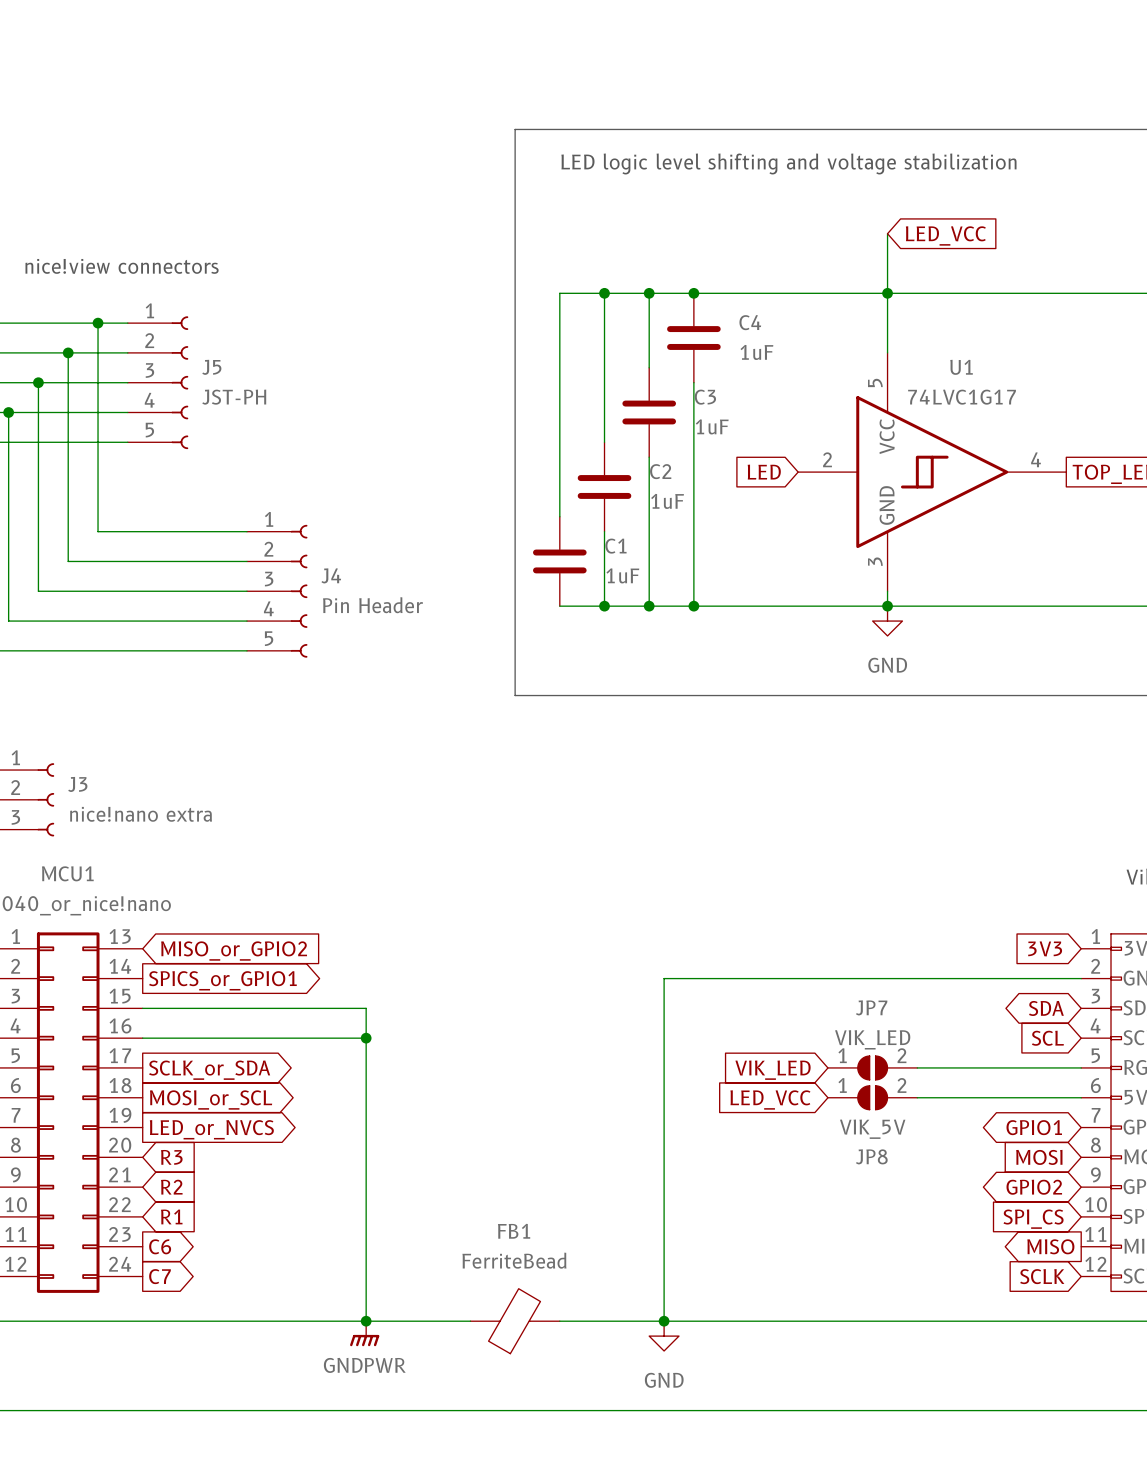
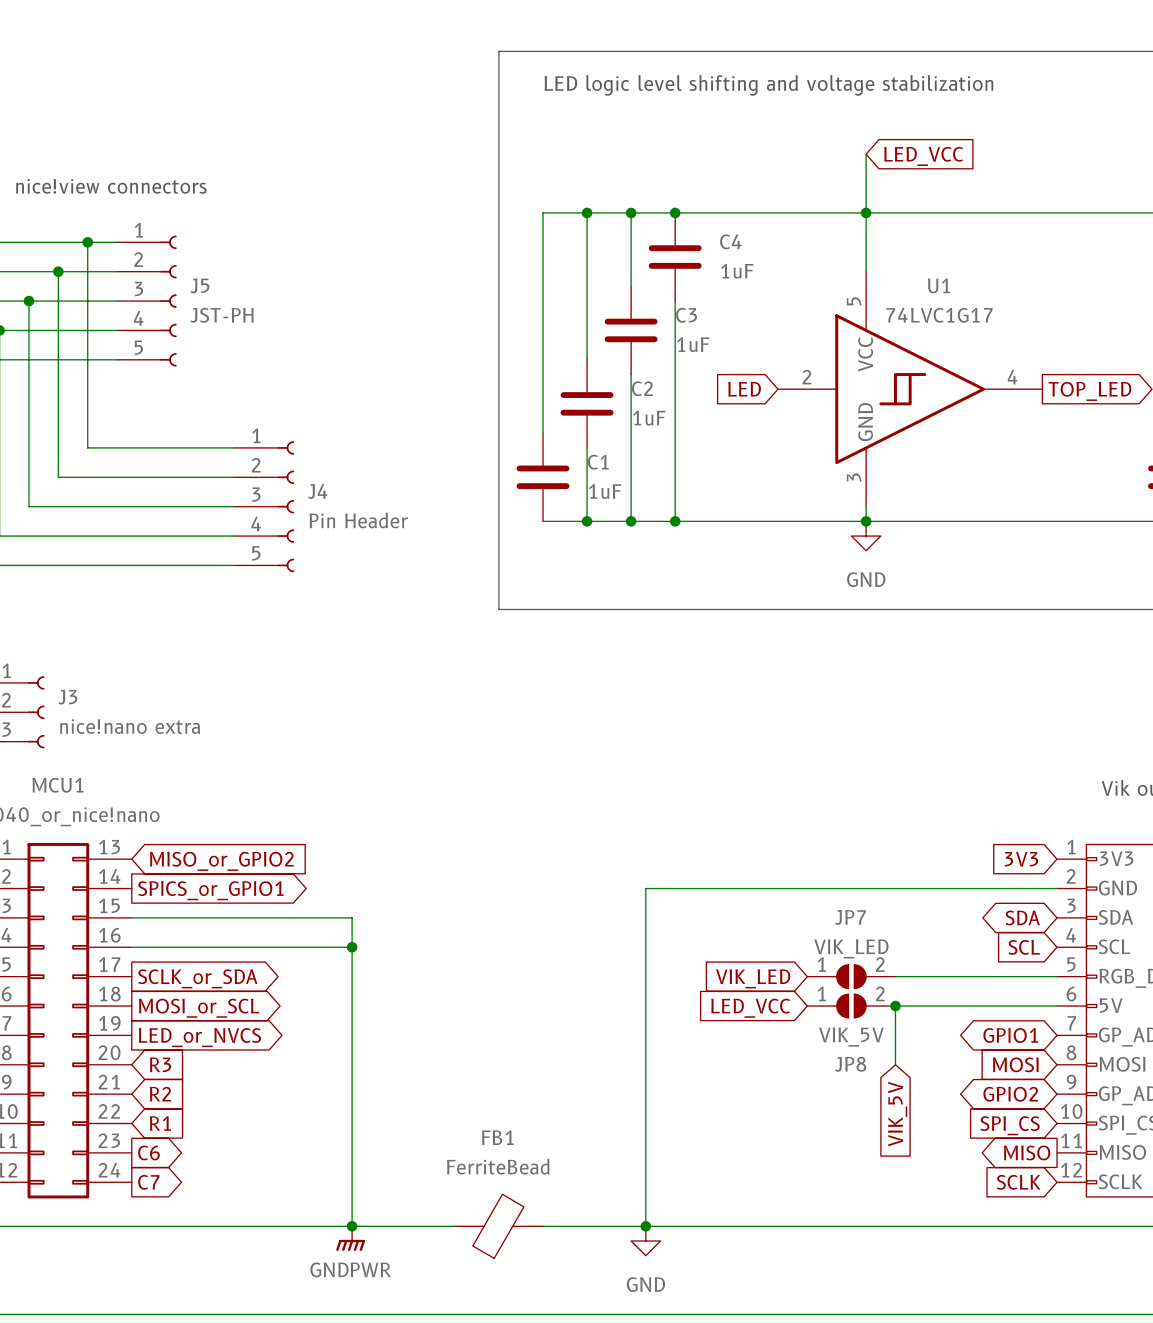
wire: none -> (895, 1006) (895, 1064)
junction: none -> (895, 1006)
global label: none -> VIK_5V (897, 1114)

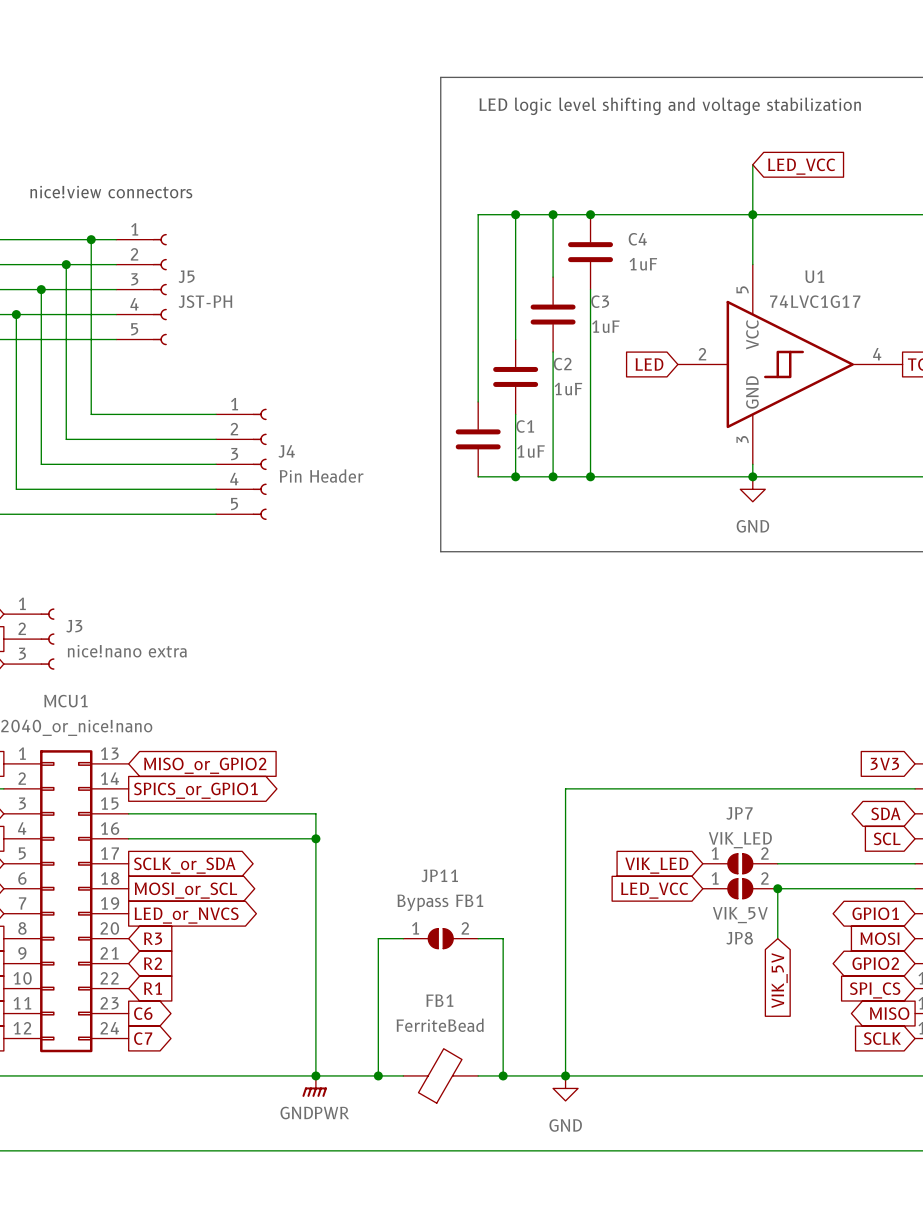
wire: none -> (403, 938) (378, 938) (378, 1075)
JP11: none -> Bypass FB1 (440, 938)
wire: none -> (478, 938) (503, 938) (503, 1075)
junction: none -> (378, 1075)
junction: none -> (503, 1075)

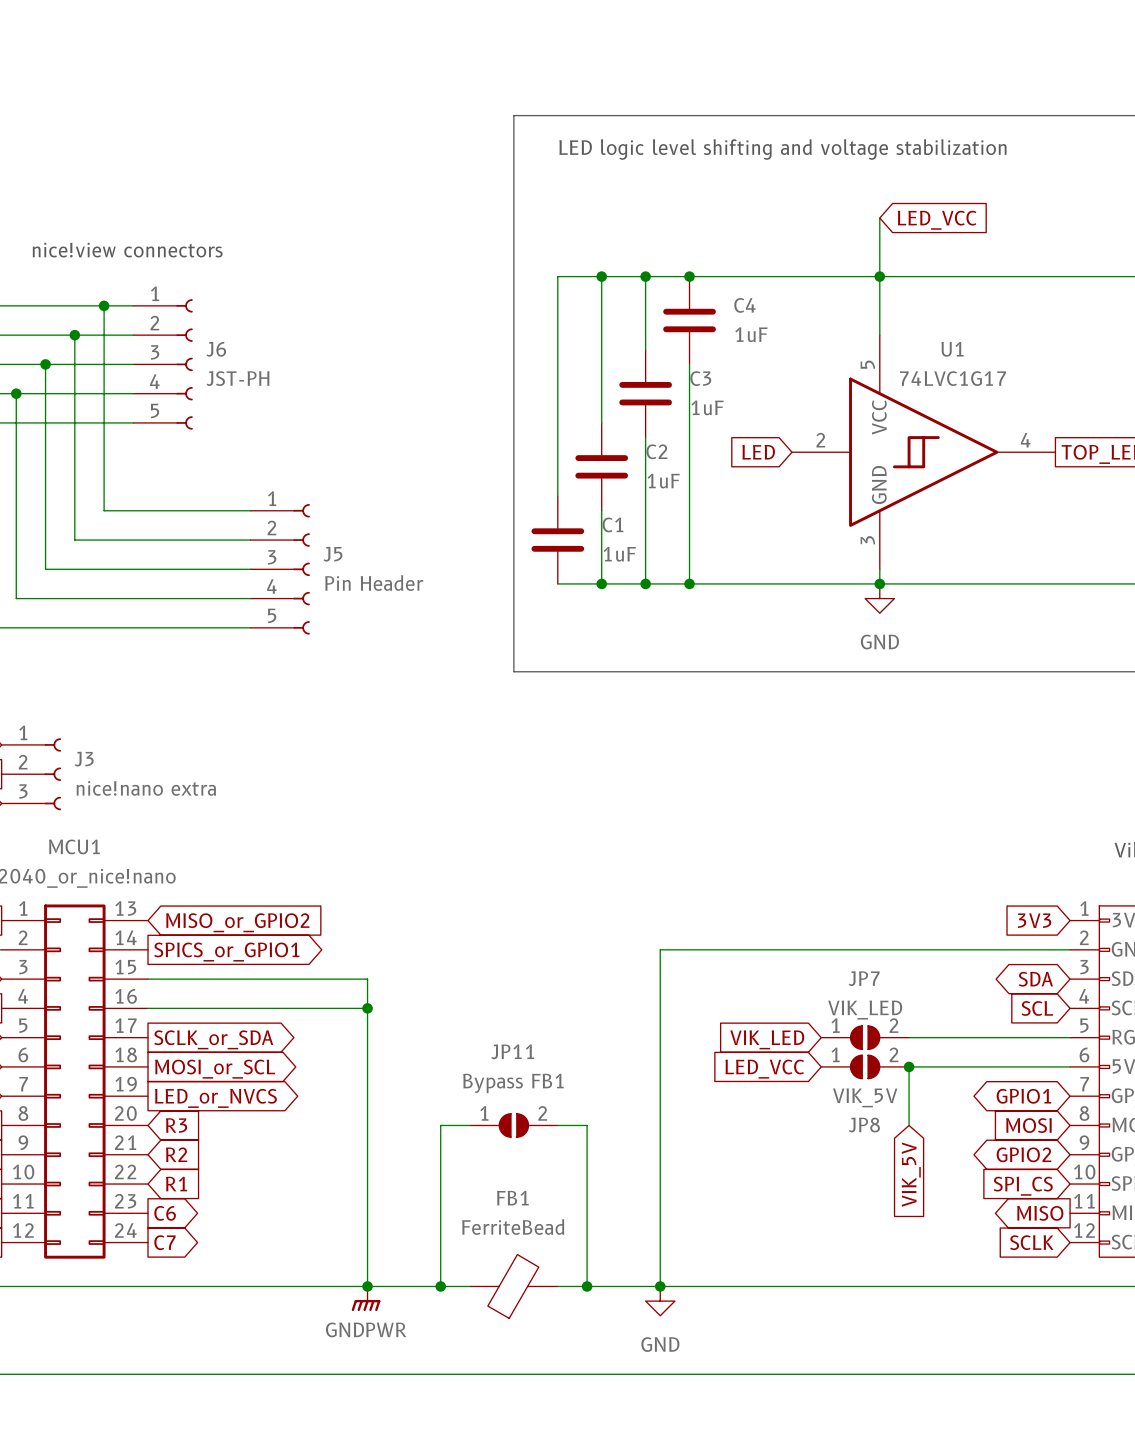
J5 name: J5 (186, 276) -> J6 (216, 349)
J4 name: J4 (286, 451) -> J5 (333, 554)

